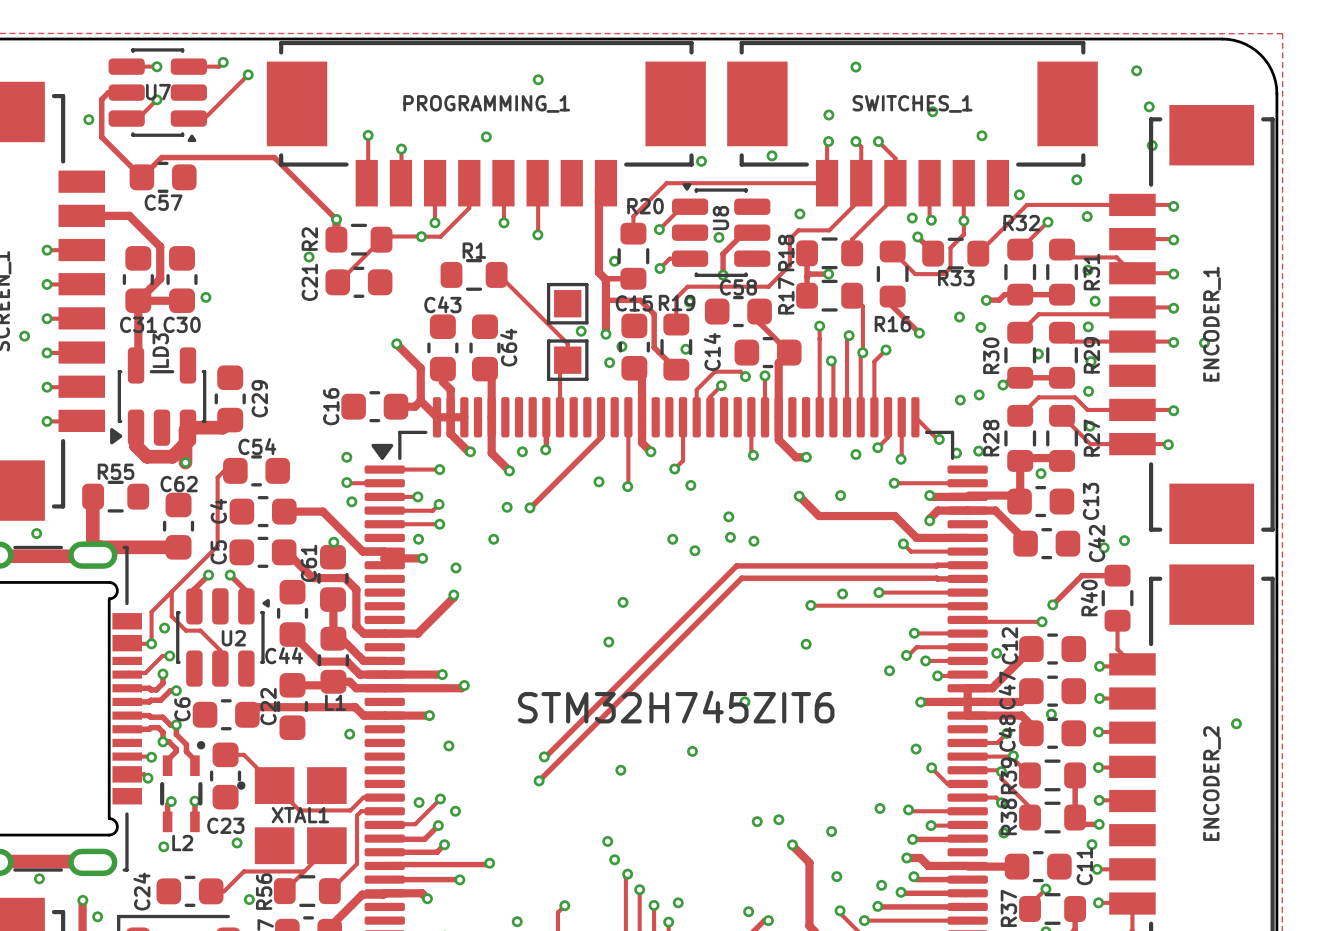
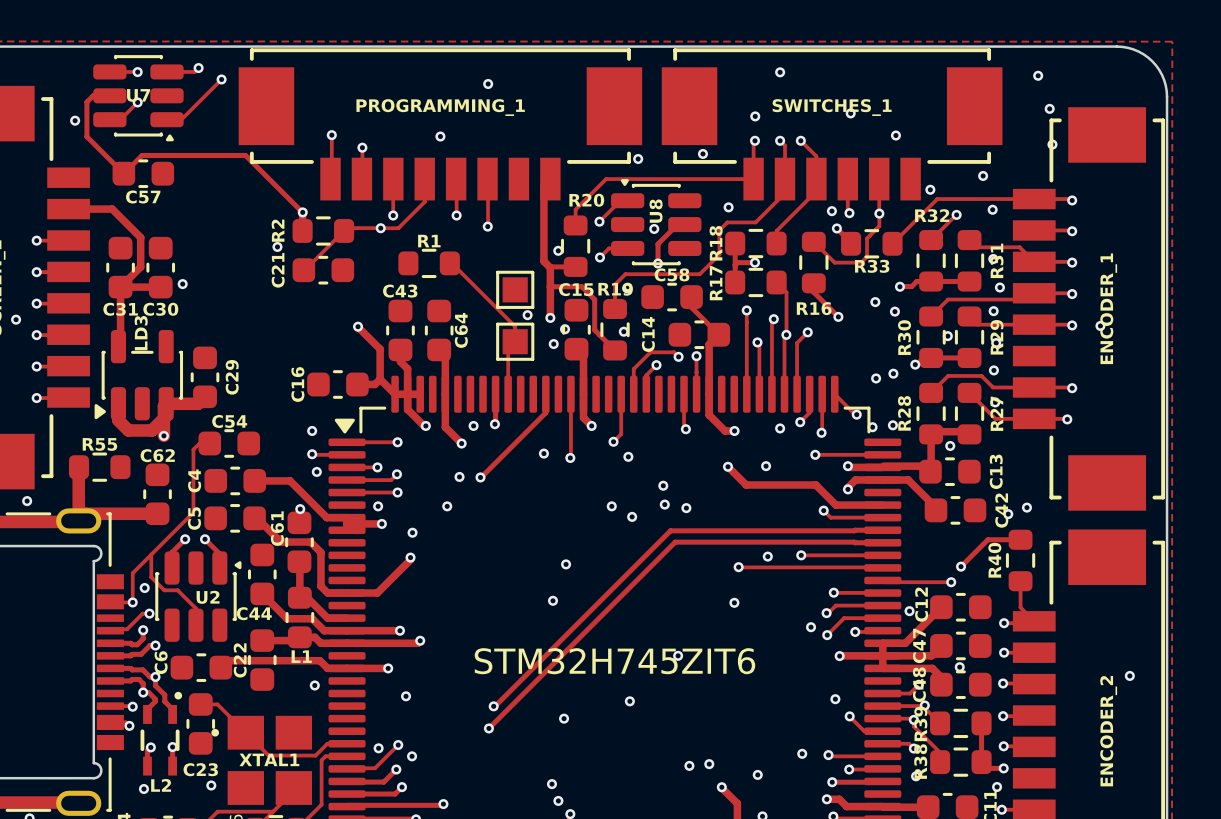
track: none -> (844, 618) (827, 635)
via position: (925, 660) -> (827, 635)

